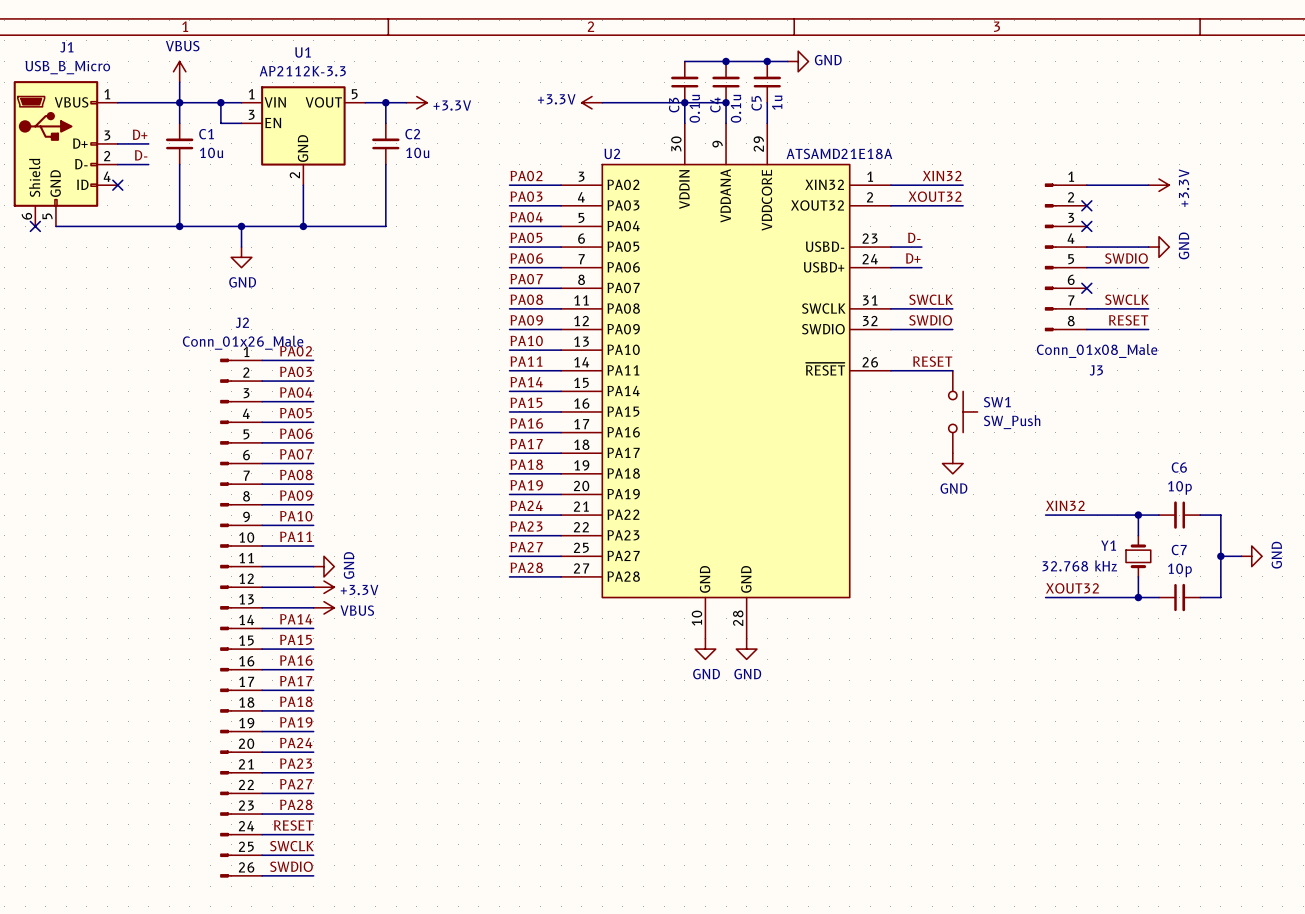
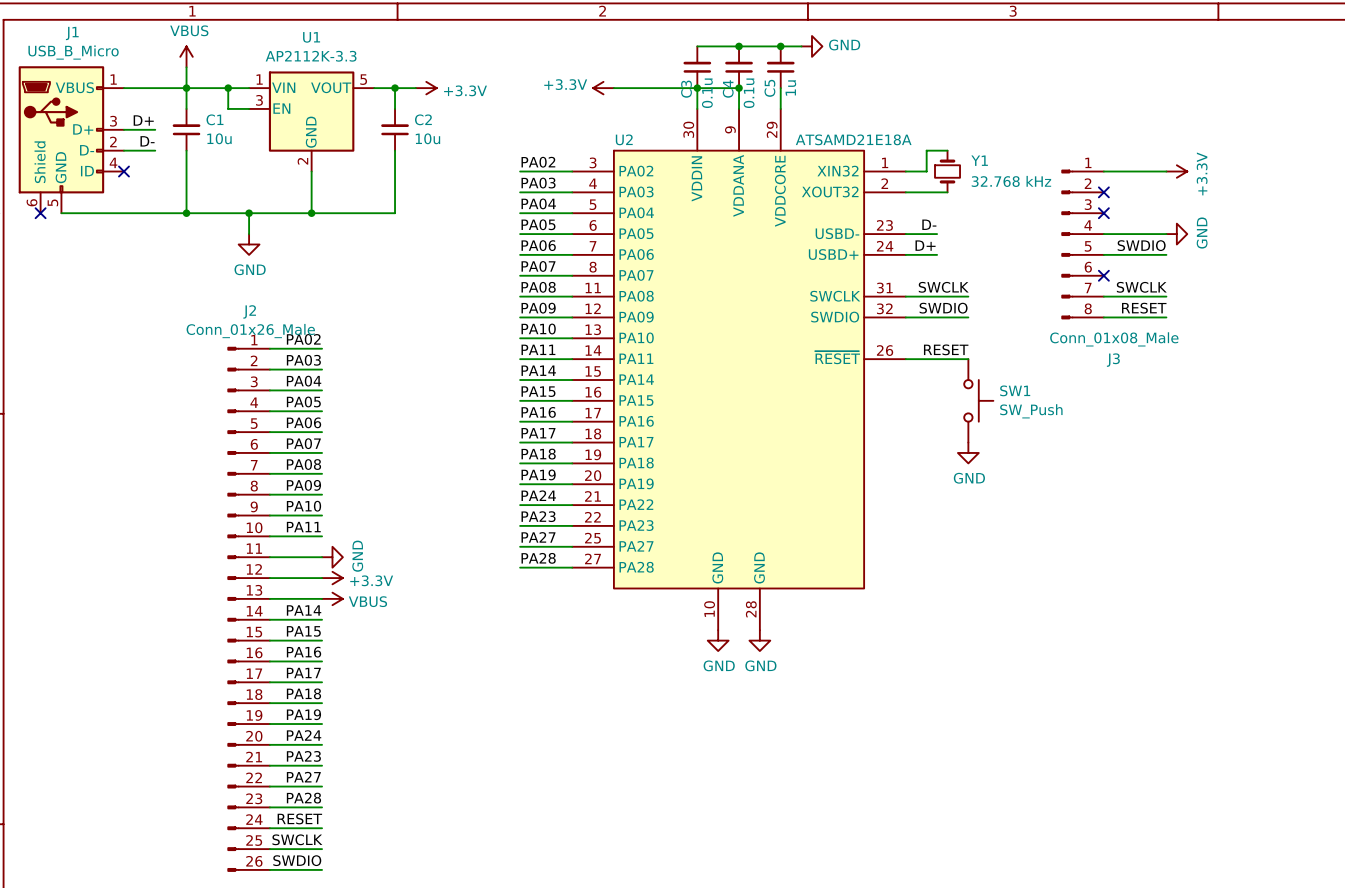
label: XIN32 (942, 175) -> none
wire: (911, 185) (963, 185) -> (926, 171) (926, 150) (947, 150)
label: XOUT32 (935, 196) -> none
wire: (932, 205) (963, 205) -> none
label: XIN32 (1065, 505) -> none
wire: (1045, 515) (1158, 515) -> none
wire: (1138, 515) (1138, 535) -> none
junction: (1138, 515) -> none
C6: 10p (1179, 515) -> none
wire: (1200, 515) (1220, 515) (1220, 597) (1200, 597) -> none
Y1 name position: Y1 (1108, 545) -> Y1 (979, 160)
Y1 position: (1138, 556) -> (947, 171)
wire: (1220, 556) (1241, 556) -> none
junction: (1220, 556) -> none
power symbol: GND (1251, 556) -> none
Y1 value position: 32.768 kHz (1079, 565) -> 32.768 kHz (1011, 181)
wire: (1138, 576) (1138, 597) -> none
label: XOUT32 (1072, 588) -> none
wire: (1045, 597) (1158, 597) -> none
junction: (1138, 597) -> none
C7: 10p (1179, 597) -> none

